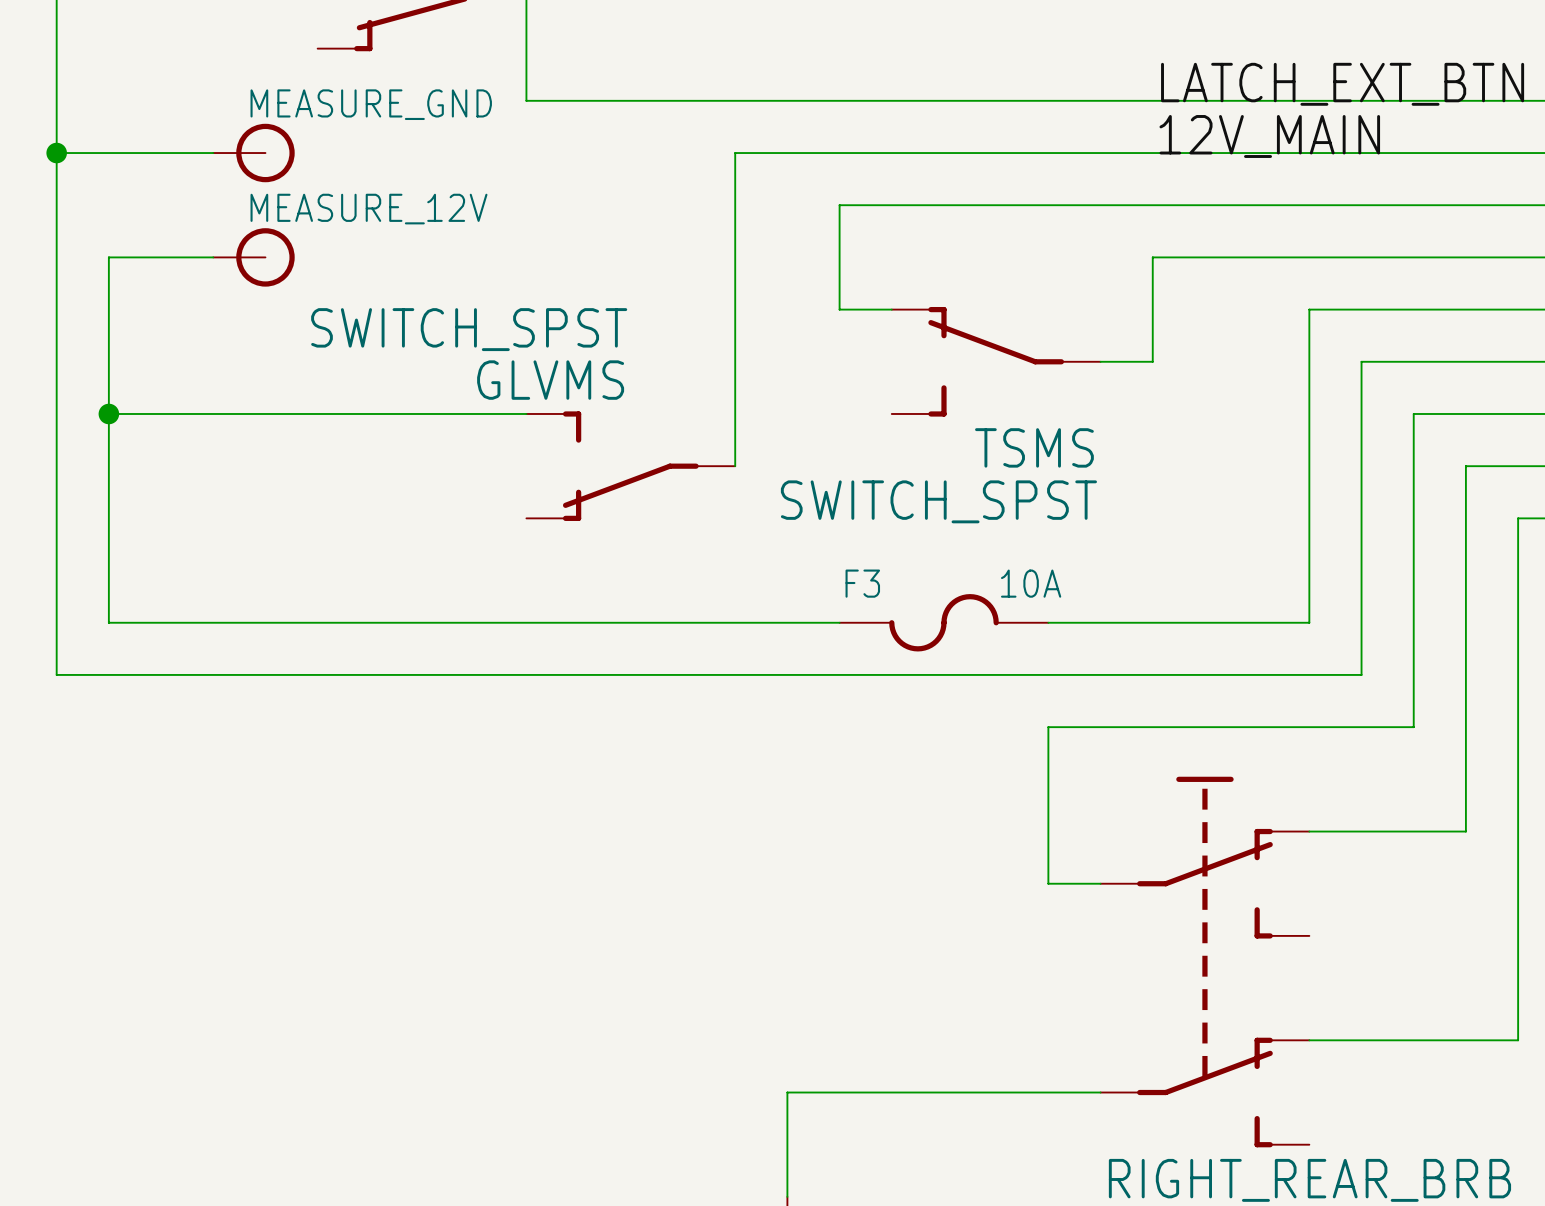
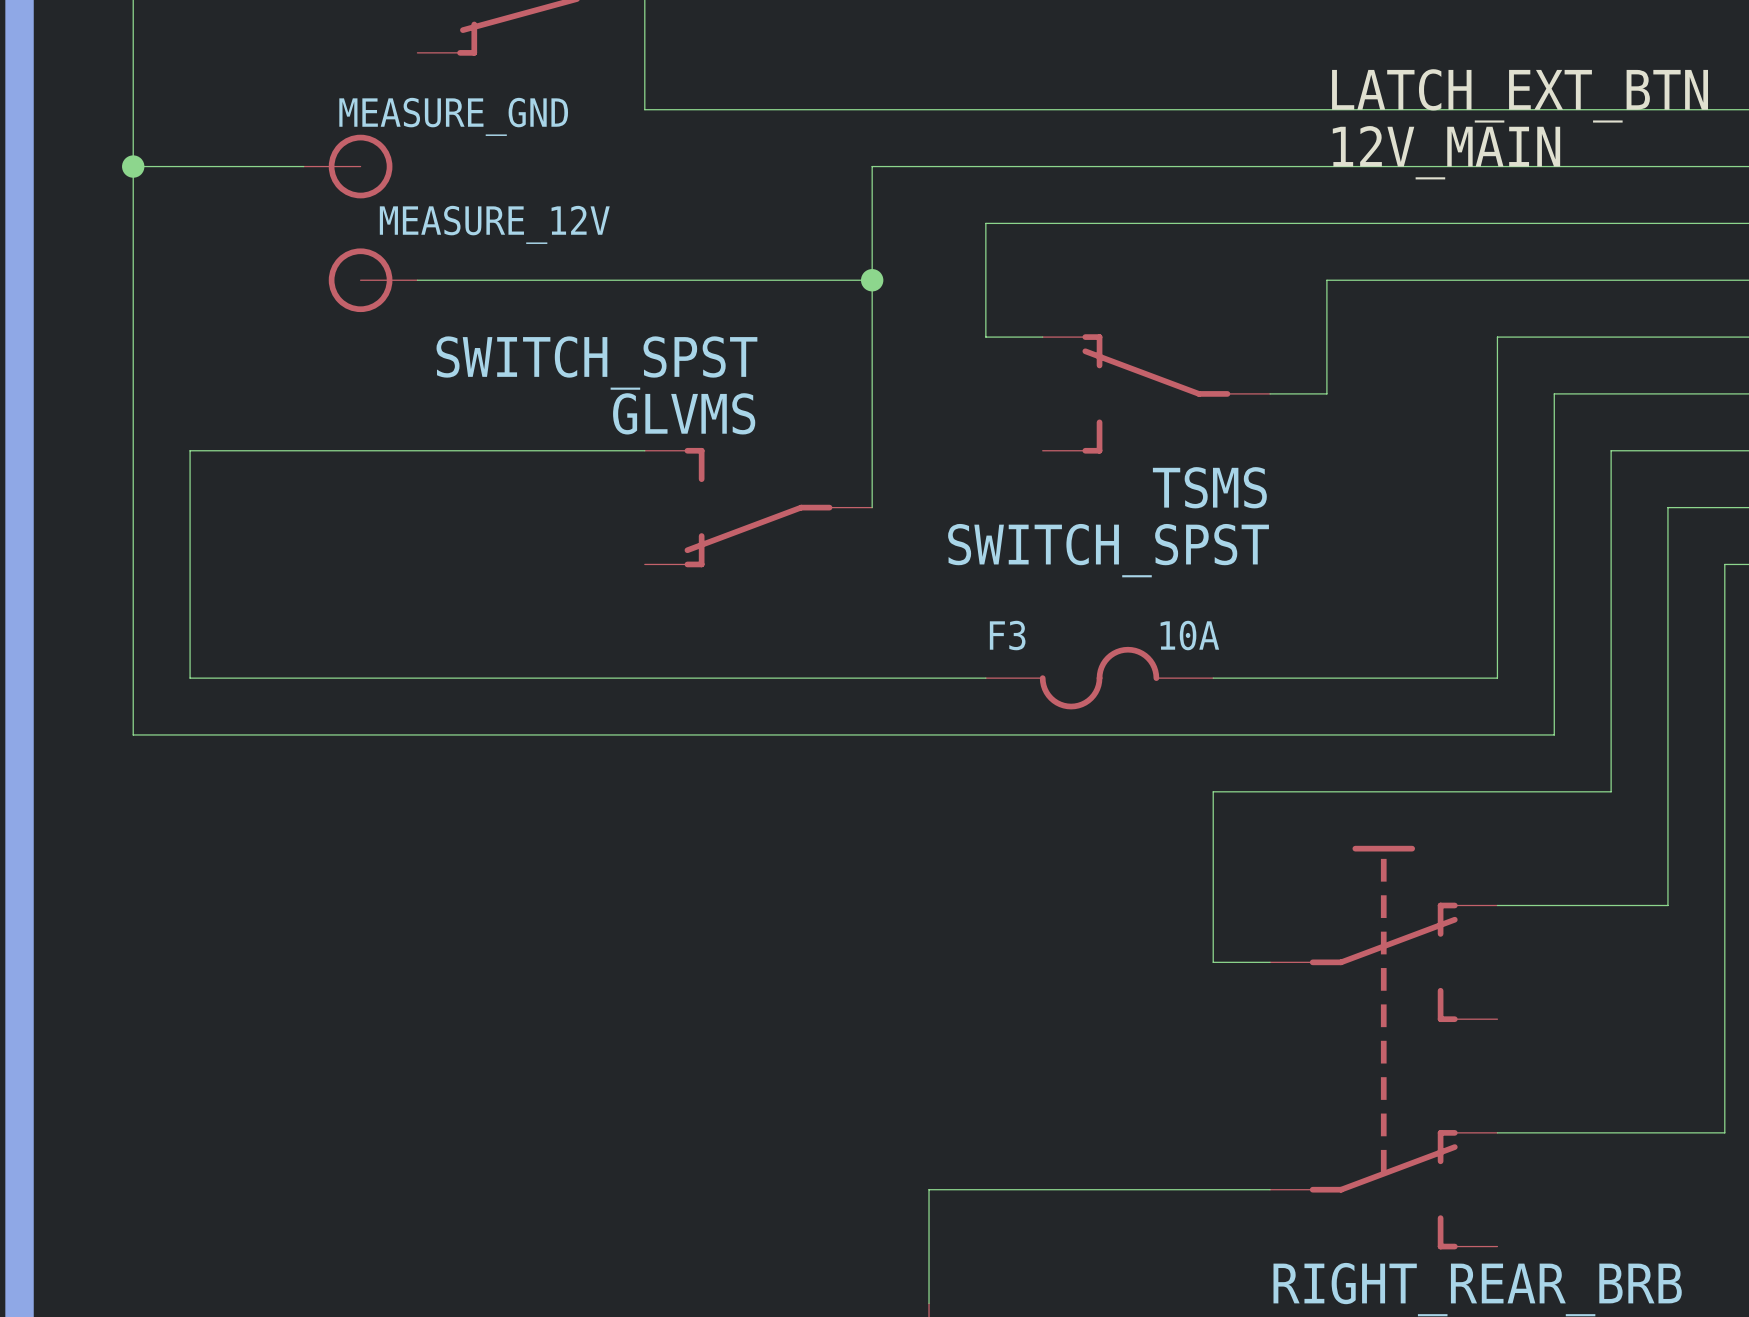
MEASURE_12V name position: MEASURE_12V (368, 209) -> MEASURE_12V (494, 224)
wire: (213, 257) (108, 257) (108, 413) -> none
MEASURE_12V rotation: 0° (265, 257) -> 180° (360, 280)
wire: none -> (417, 280) (872, 280)
junction: none -> (872, 280)
junction: (108, 413) -> none

